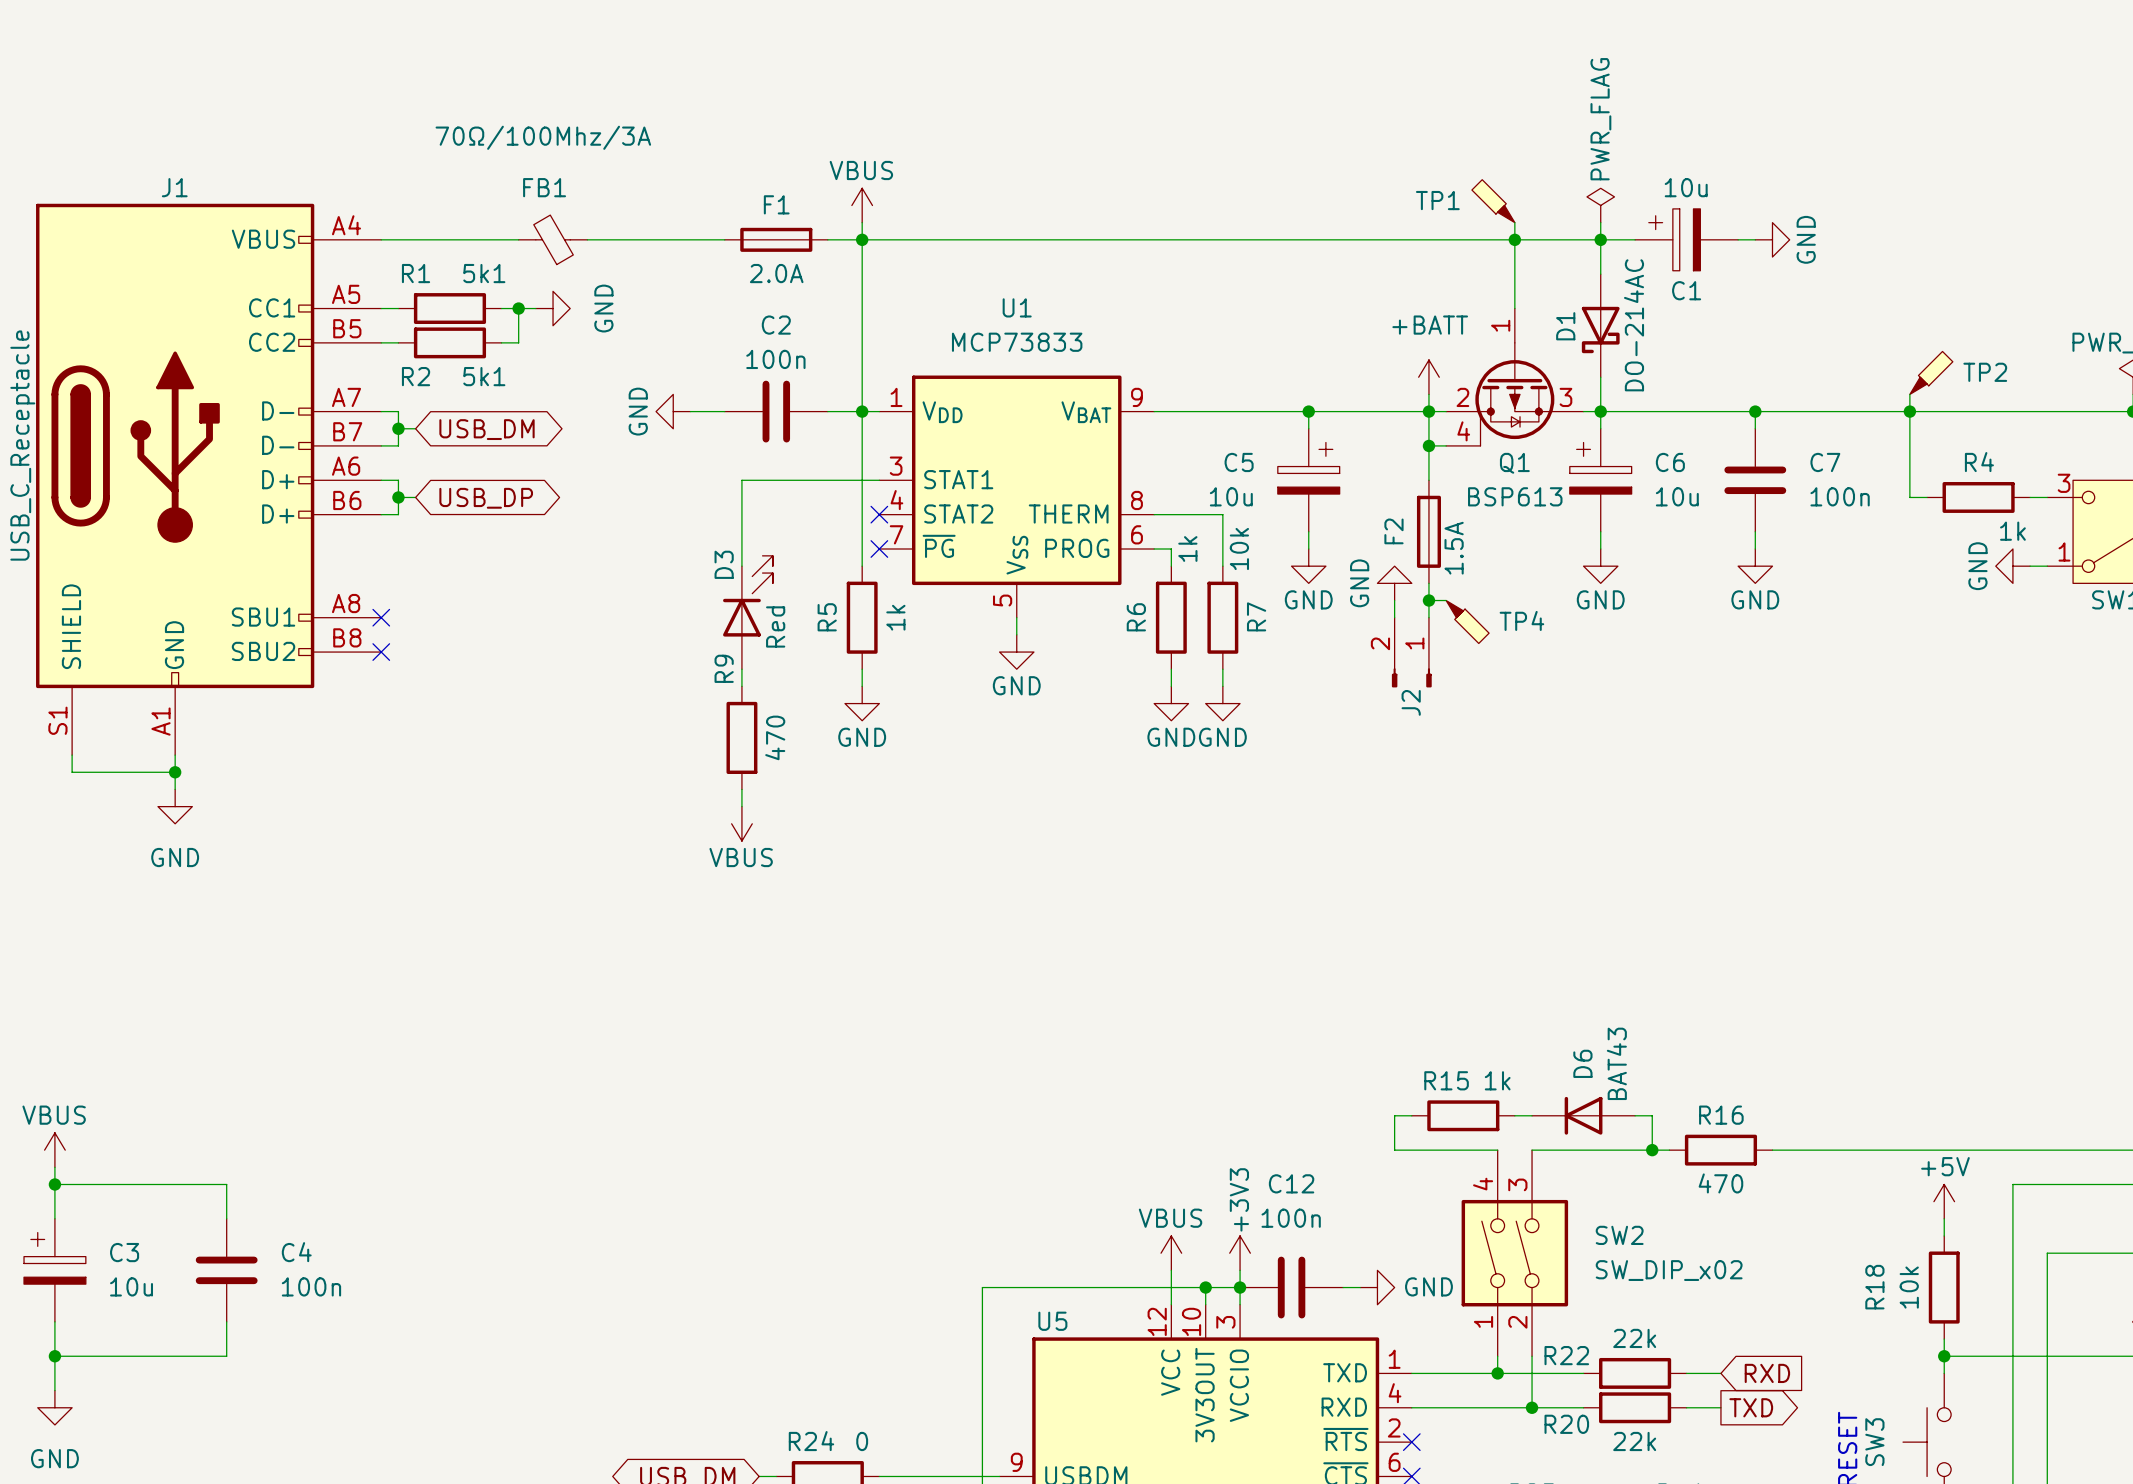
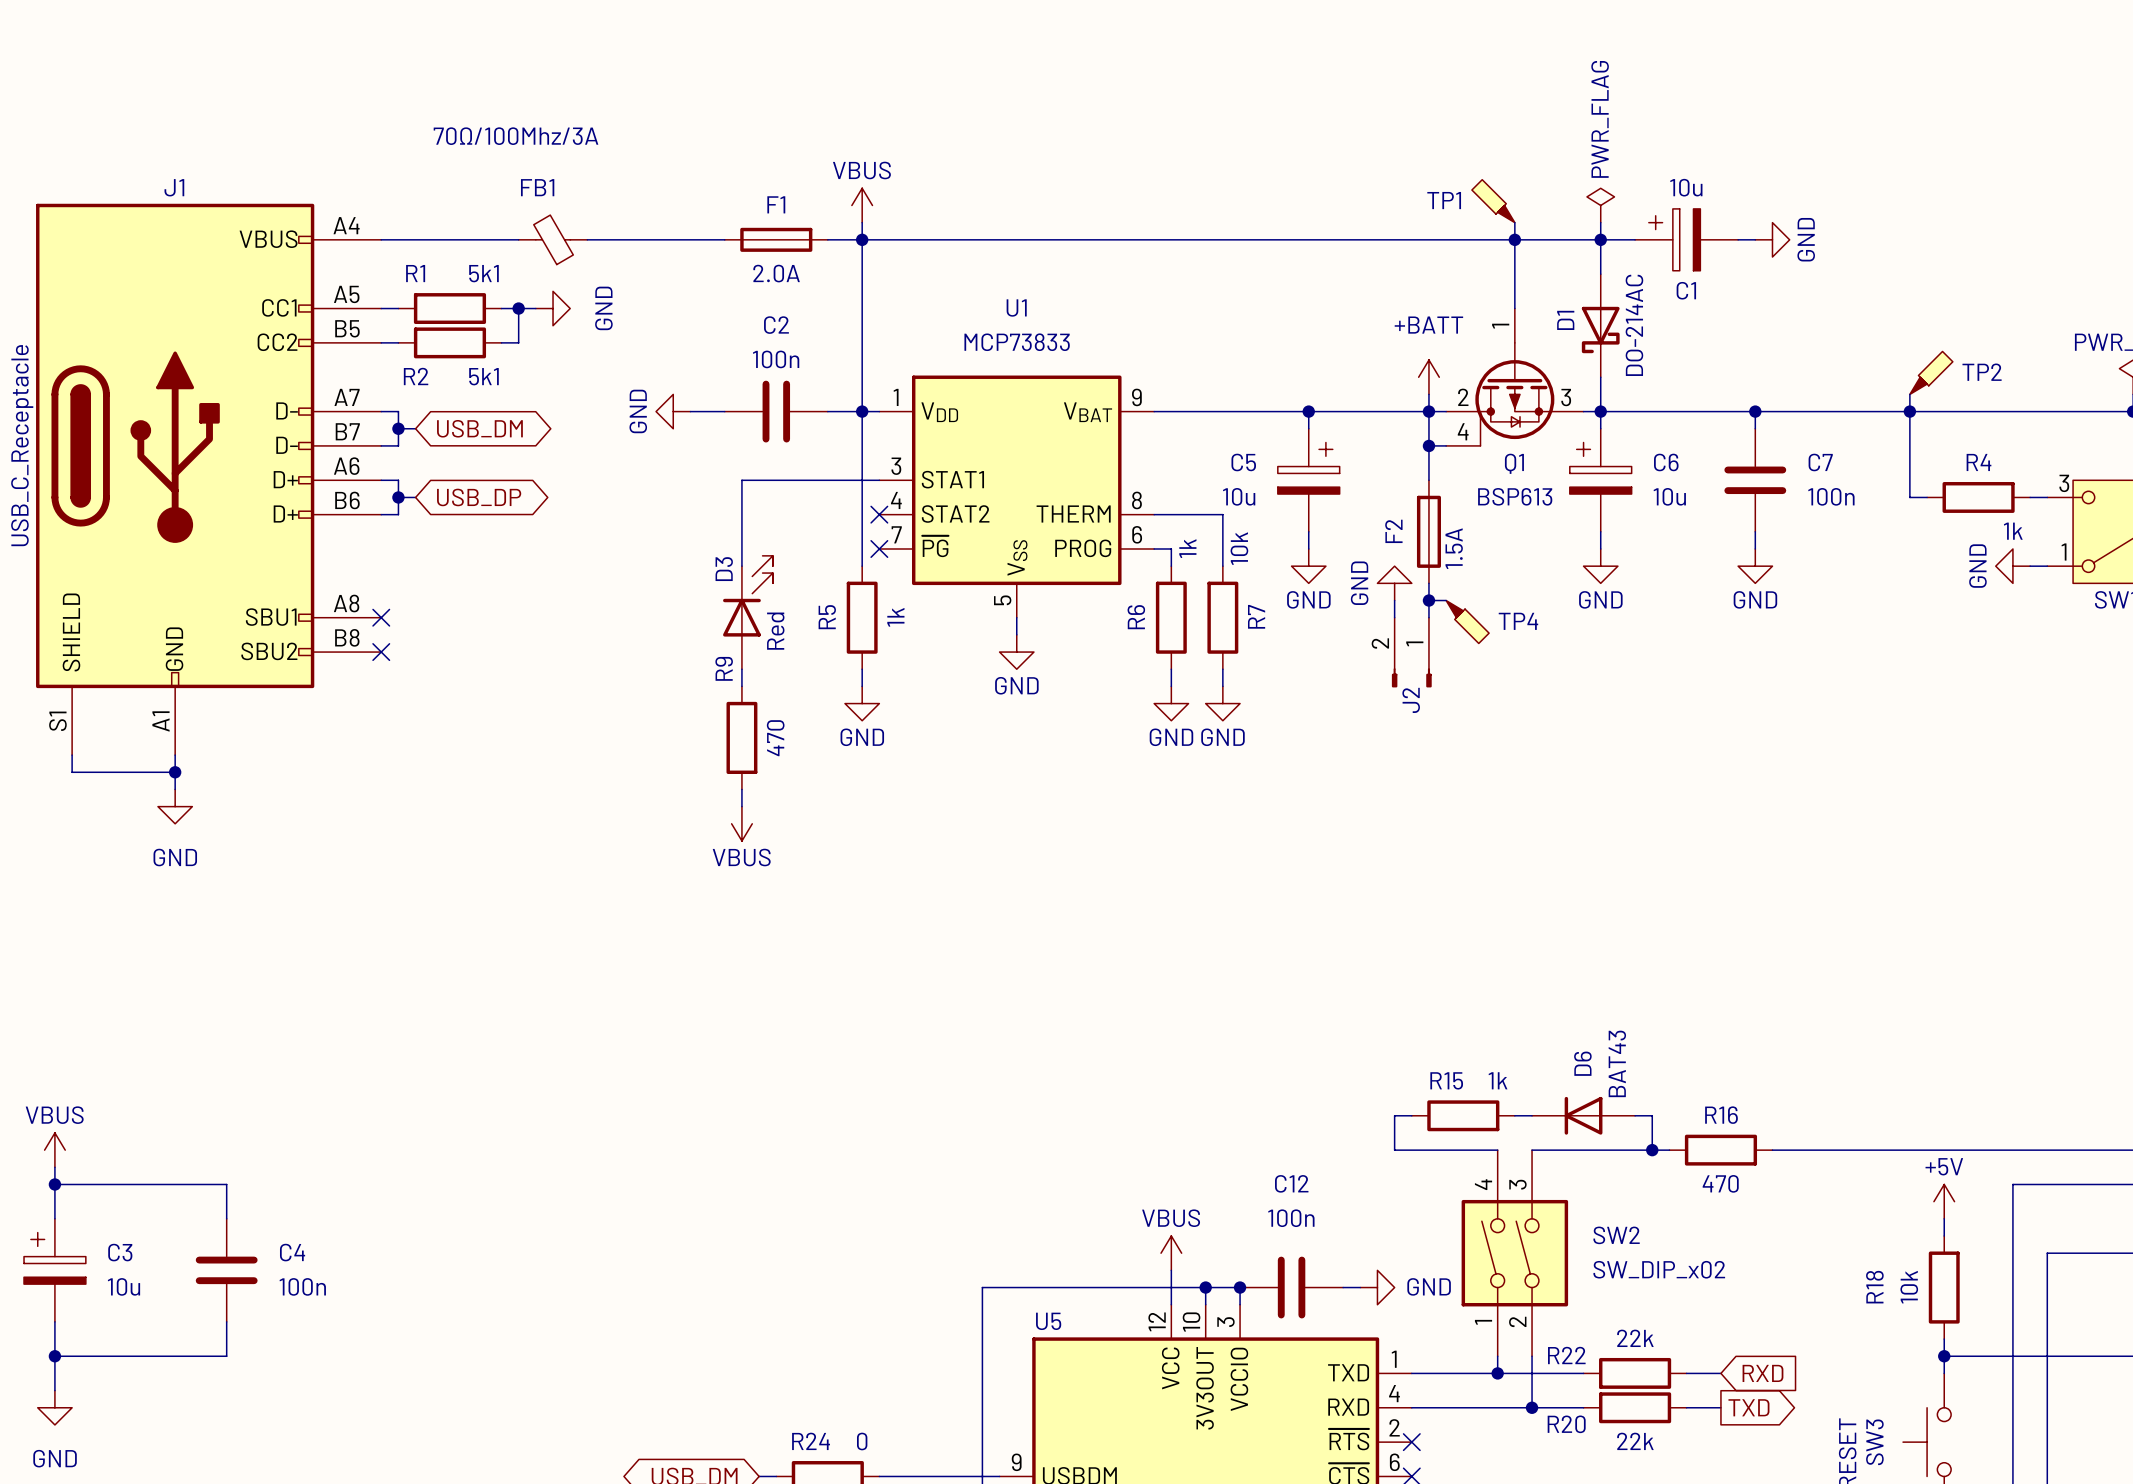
power symbol: +3V3 (1240, 1253) -> none
wire: (1240, 1270) (1240, 1287) -> none

